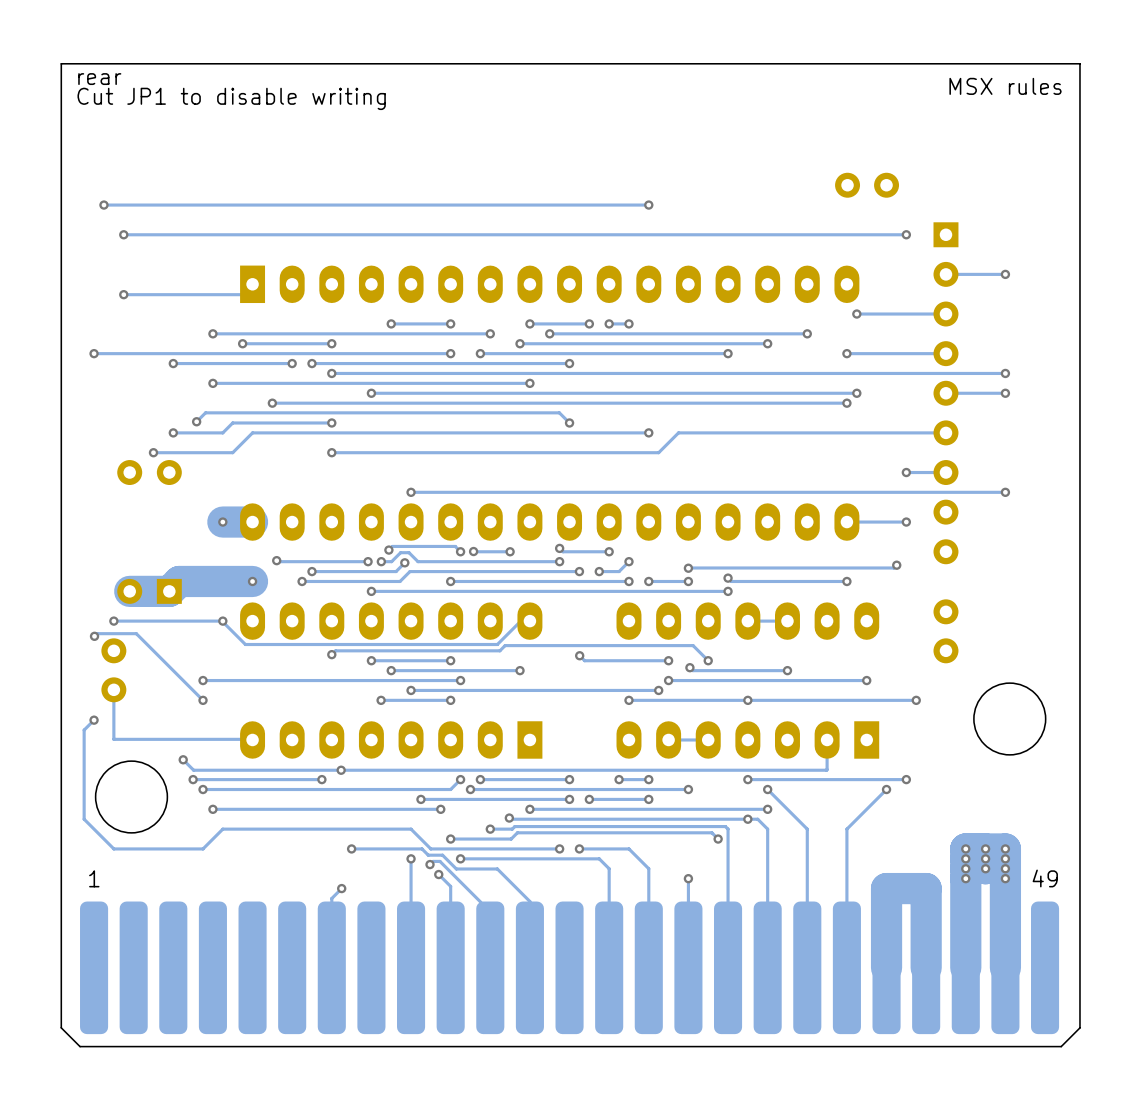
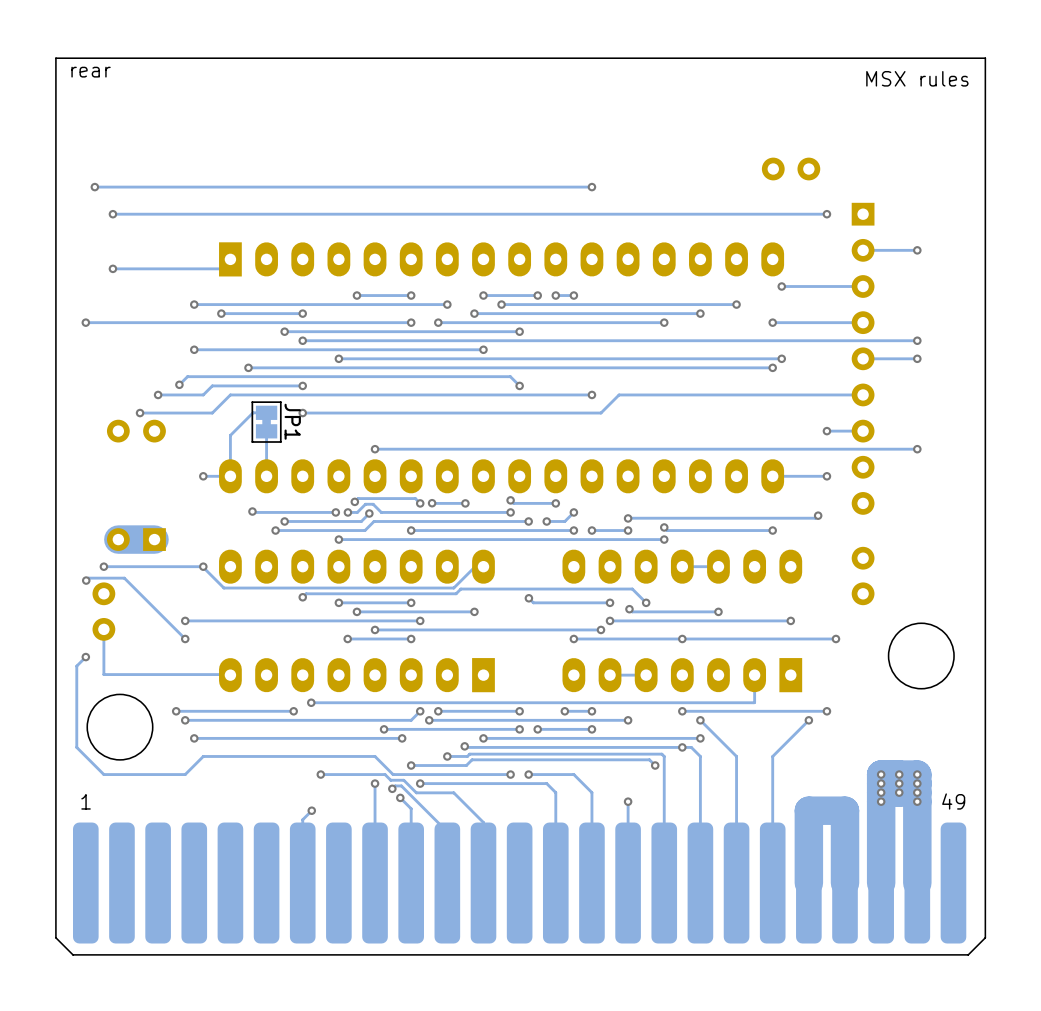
text: Cut JP1 to disable writing (231, 98) -> none
via: (173, 363) -> none
track: (292, 363) (173, 363) -> none
via: (292, 363) -> none
track: none -> (266, 412) (253, 412) (230, 435) (230, 476)
JP1: none -> (266, 422)
track: none -> (266, 431) (266, 476)
track width: thick (252, 522) (222, 522) -> thin (230, 476) (203, 476)
track: (252, 581) (179, 581) (169, 591) -> none
via: (252, 581) -> none
track: (183, 759) (193, 770) (341, 770) -> none
via: (183, 759) -> none

